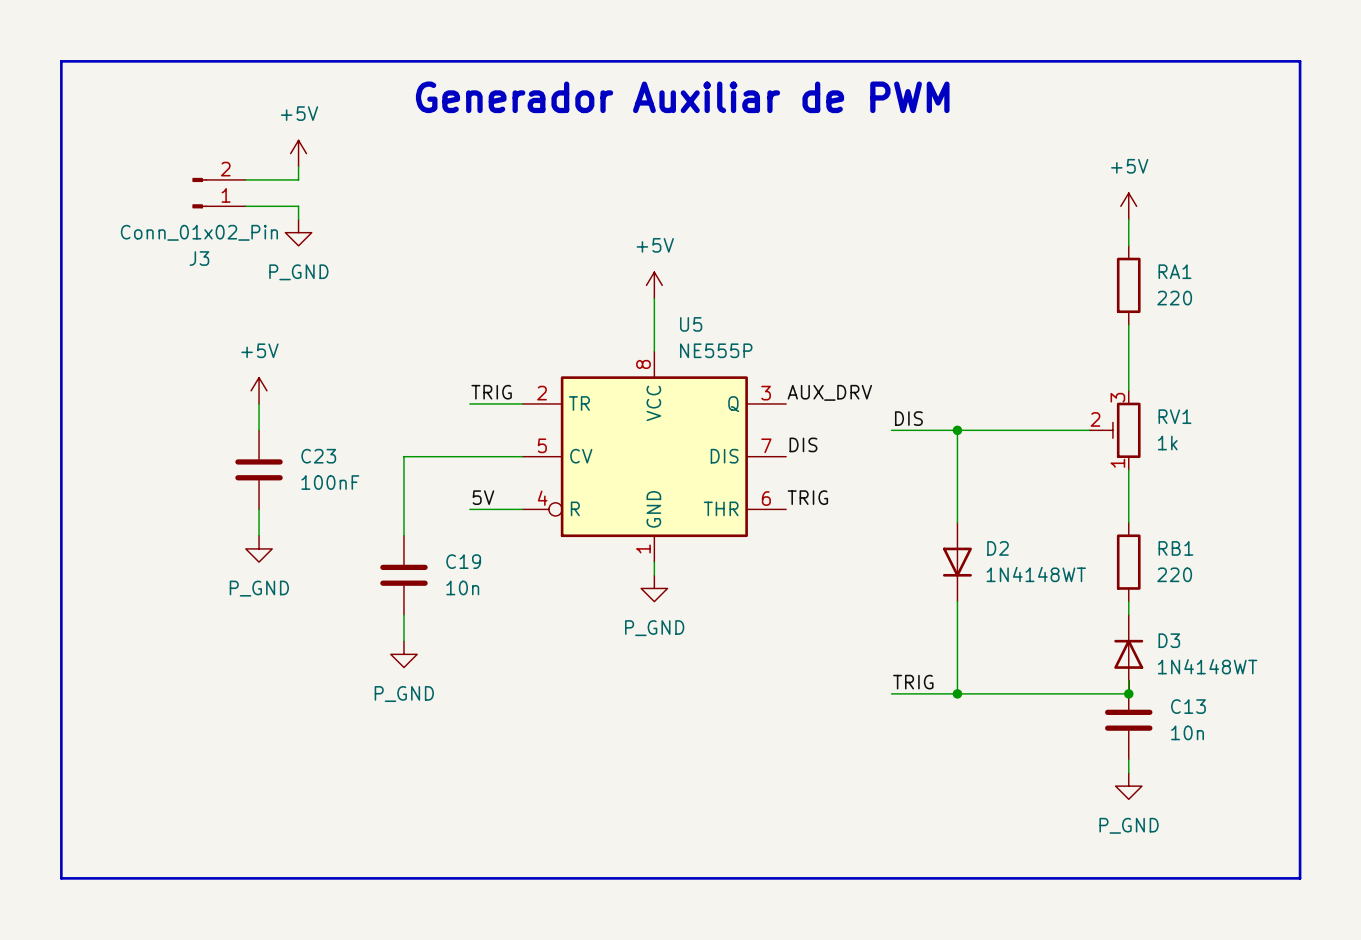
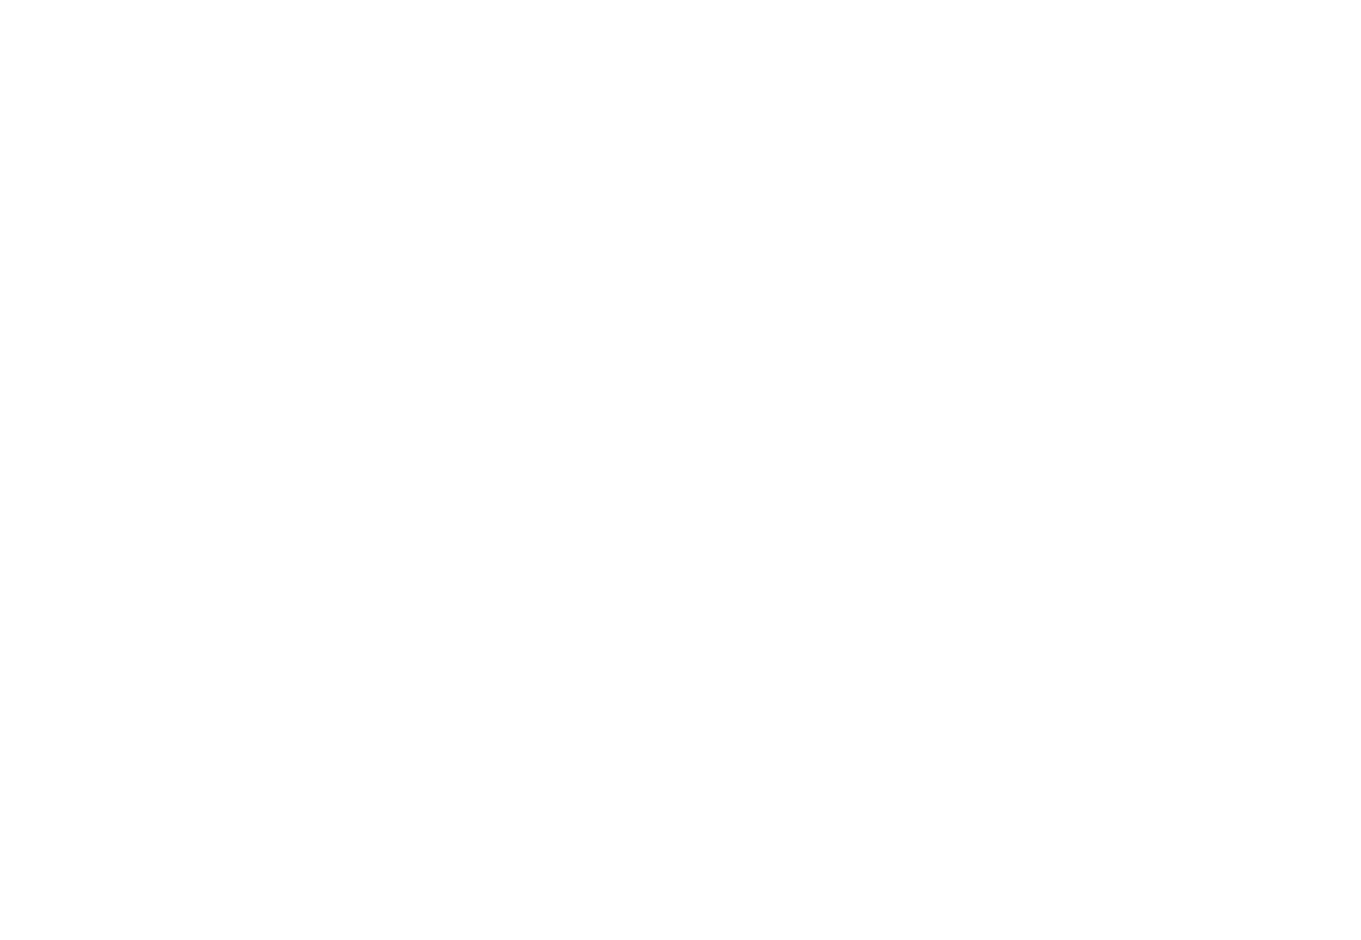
line: (61, 61) (1300, 61) (1300, 878) (61, 878) (61, 61) -> none
text: Generador Auxiliar de PWM (682, 97) -> none
power symbol: +5V (298, 153) -> none
wire: (298, 166) (298, 179) (245, 179) -> none
J3: Conn_01x02_Pin (219, 193) -> none
wire: (245, 206) (298, 206) (298, 219) -> none
power symbol: +5V (1128, 206) -> none
wire: (1128, 219) (1128, 245) -> none
power symbol: P_GND (298, 232) -> none
power symbol: +5V (654, 285) -> none
RA1: 220 (1128, 285) -> none
wire: (654, 298) (654, 351) -> none
wire: (1128, 324) (1128, 390) -> none
power symbol: +5V (259, 390) -> none
label: TRIG (491, 392) -> none
label: AUX_DRV (829, 392) -> none
wire: (259, 403) (259, 430) -> none
wire: (469, 403) (522, 403) -> none
label: DIS (908, 418) -> none
wire: (891, 430) (1089, 430) -> none
wire: (957, 430) (957, 522) -> none
junction: (957, 430) -> none
RV1: 1k (1114, 430) -> none
label: DIS (803, 444) -> none
wire: (522, 456) (403, 456) (403, 535) -> none
U5: NE555P (654, 456) -> none
C23: 100nF (259, 469) -> none
wire: (1128, 469) (1128, 522) -> none
label: 5V (483, 497) -> none
label: TRIG (807, 497) -> none
wire: (259, 509) (259, 535) -> none
wire: (469, 509) (522, 509) -> none
power symbol: P_GND (259, 548) -> none
wire: (654, 562) (654, 575) -> none
D2: 1N4148WT (957, 562) -> none
RB1: 220 (1128, 562) -> none
C19: 10n (403, 575) -> none
power symbol: P_GND (654, 588) -> none
wire: (957, 601) (957, 693) -> none
wire: (1128, 601) (1128, 614) -> none
wire: (403, 614) (403, 641) -> none
power symbol: P_GND (403, 654) -> none
D3: 1N4148WT (1128, 654) -> none
wire: (1128, 680) (1128, 693) (891, 693) -> none
label: TRIG (913, 682) -> none
junction: (957, 693) -> none
junction: (1128, 693) -> none
C13: 10n (1128, 720) -> none
wire: (1128, 759) (1128, 772) -> none
power symbol: P_GND (1128, 786) -> none

